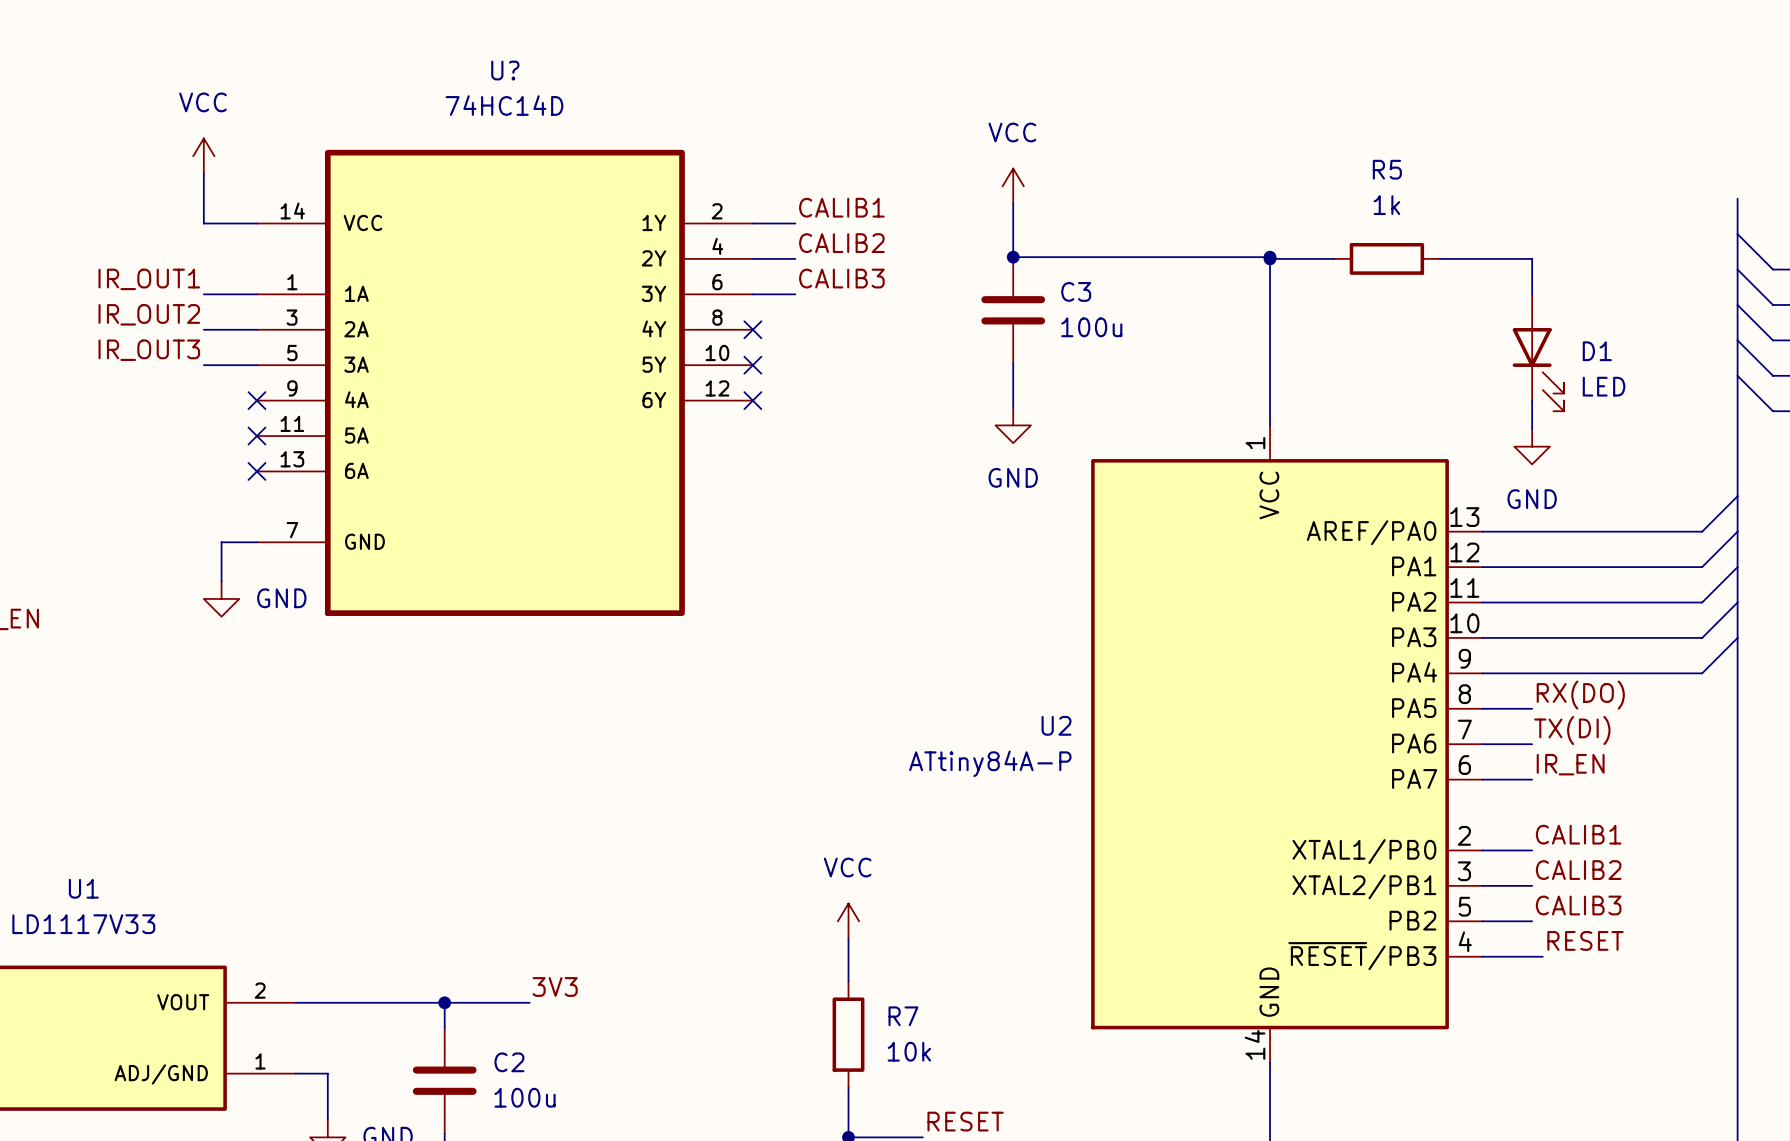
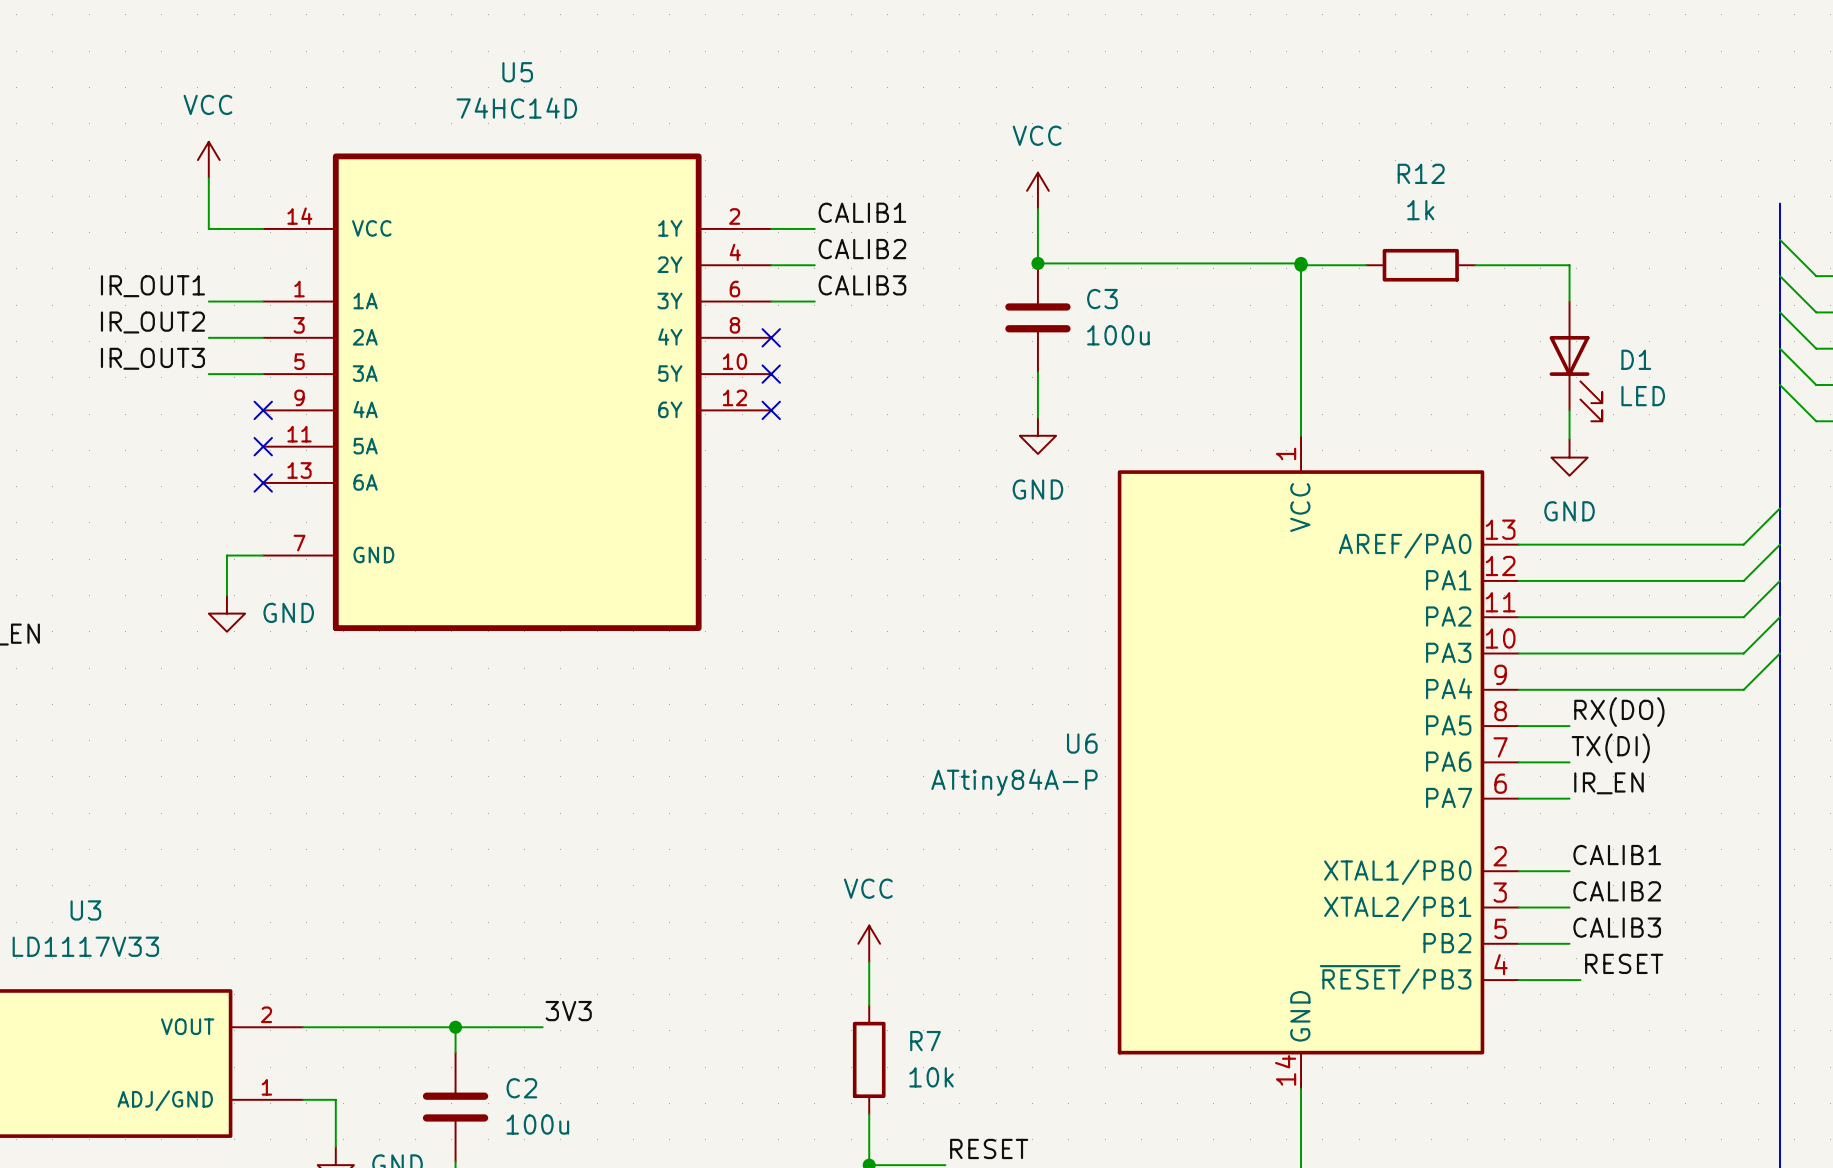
U? name: U? (505, 70) -> U5 (517, 72)
R5 name: R5 (1387, 169) -> R12 (1421, 173)
U2 name: U2 (1056, 725) -> U6 (1082, 743)
U1 name: U1 (83, 888) -> U3 (85, 910)

